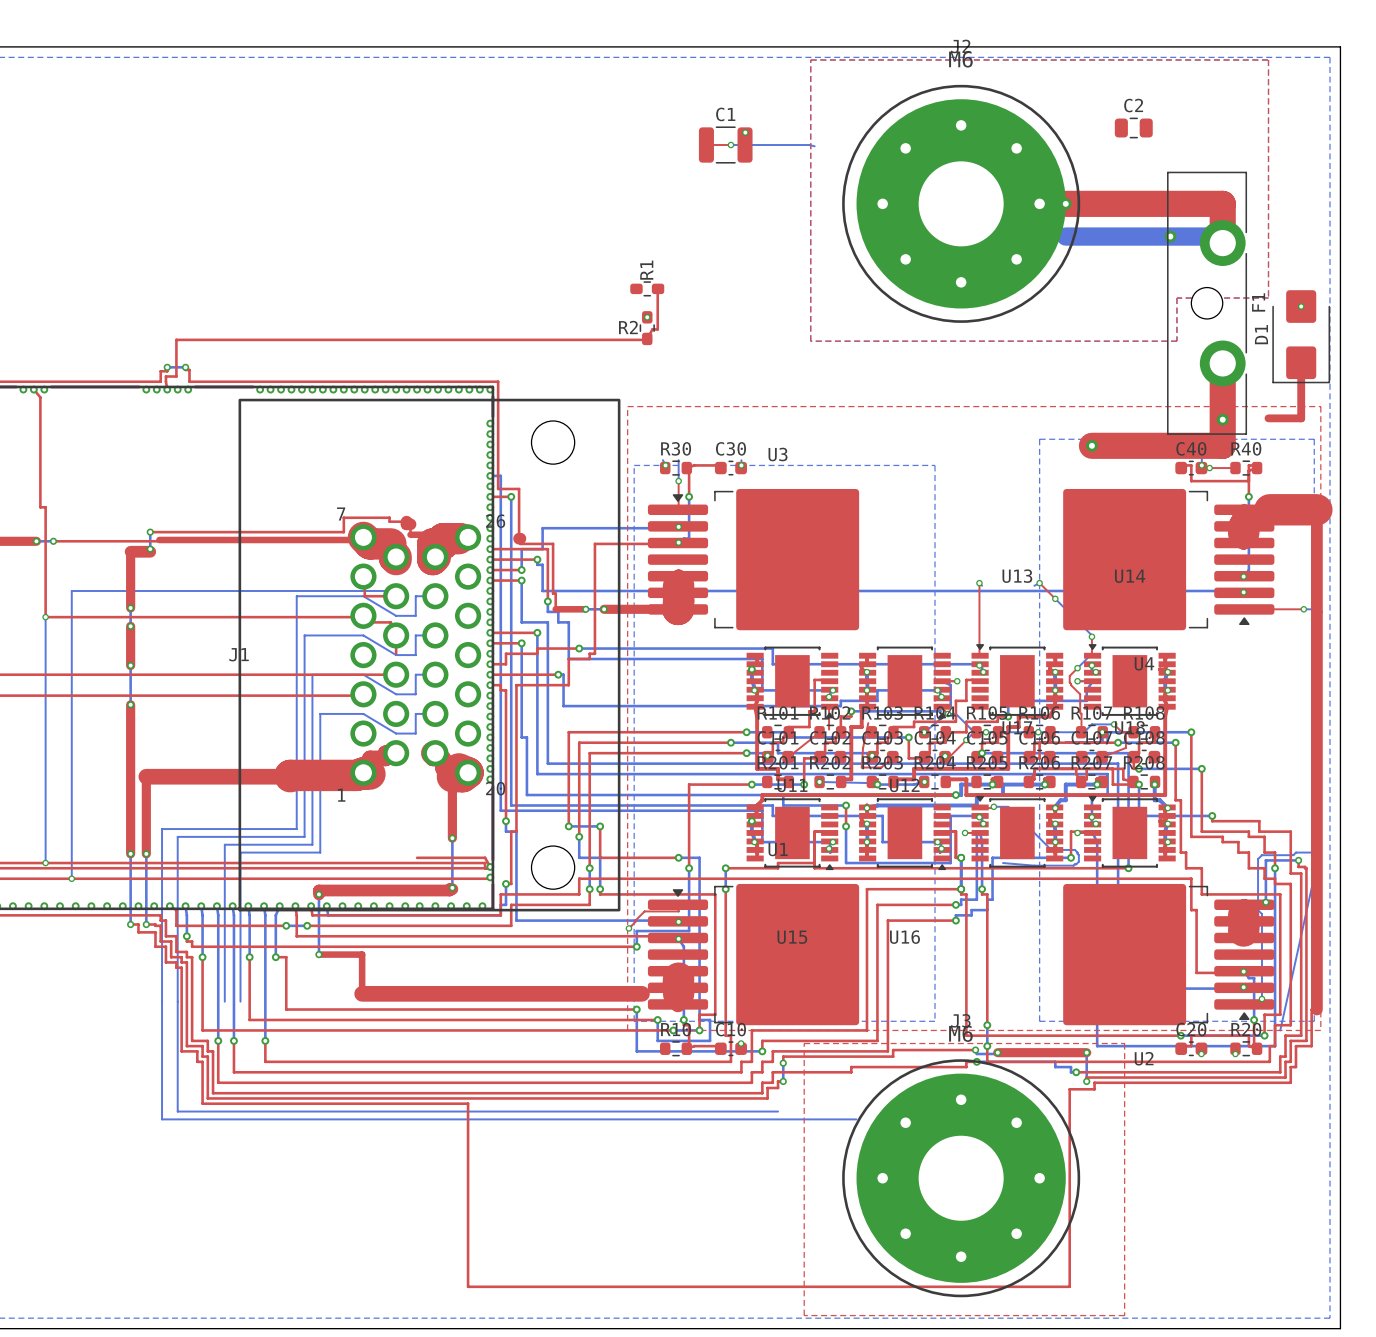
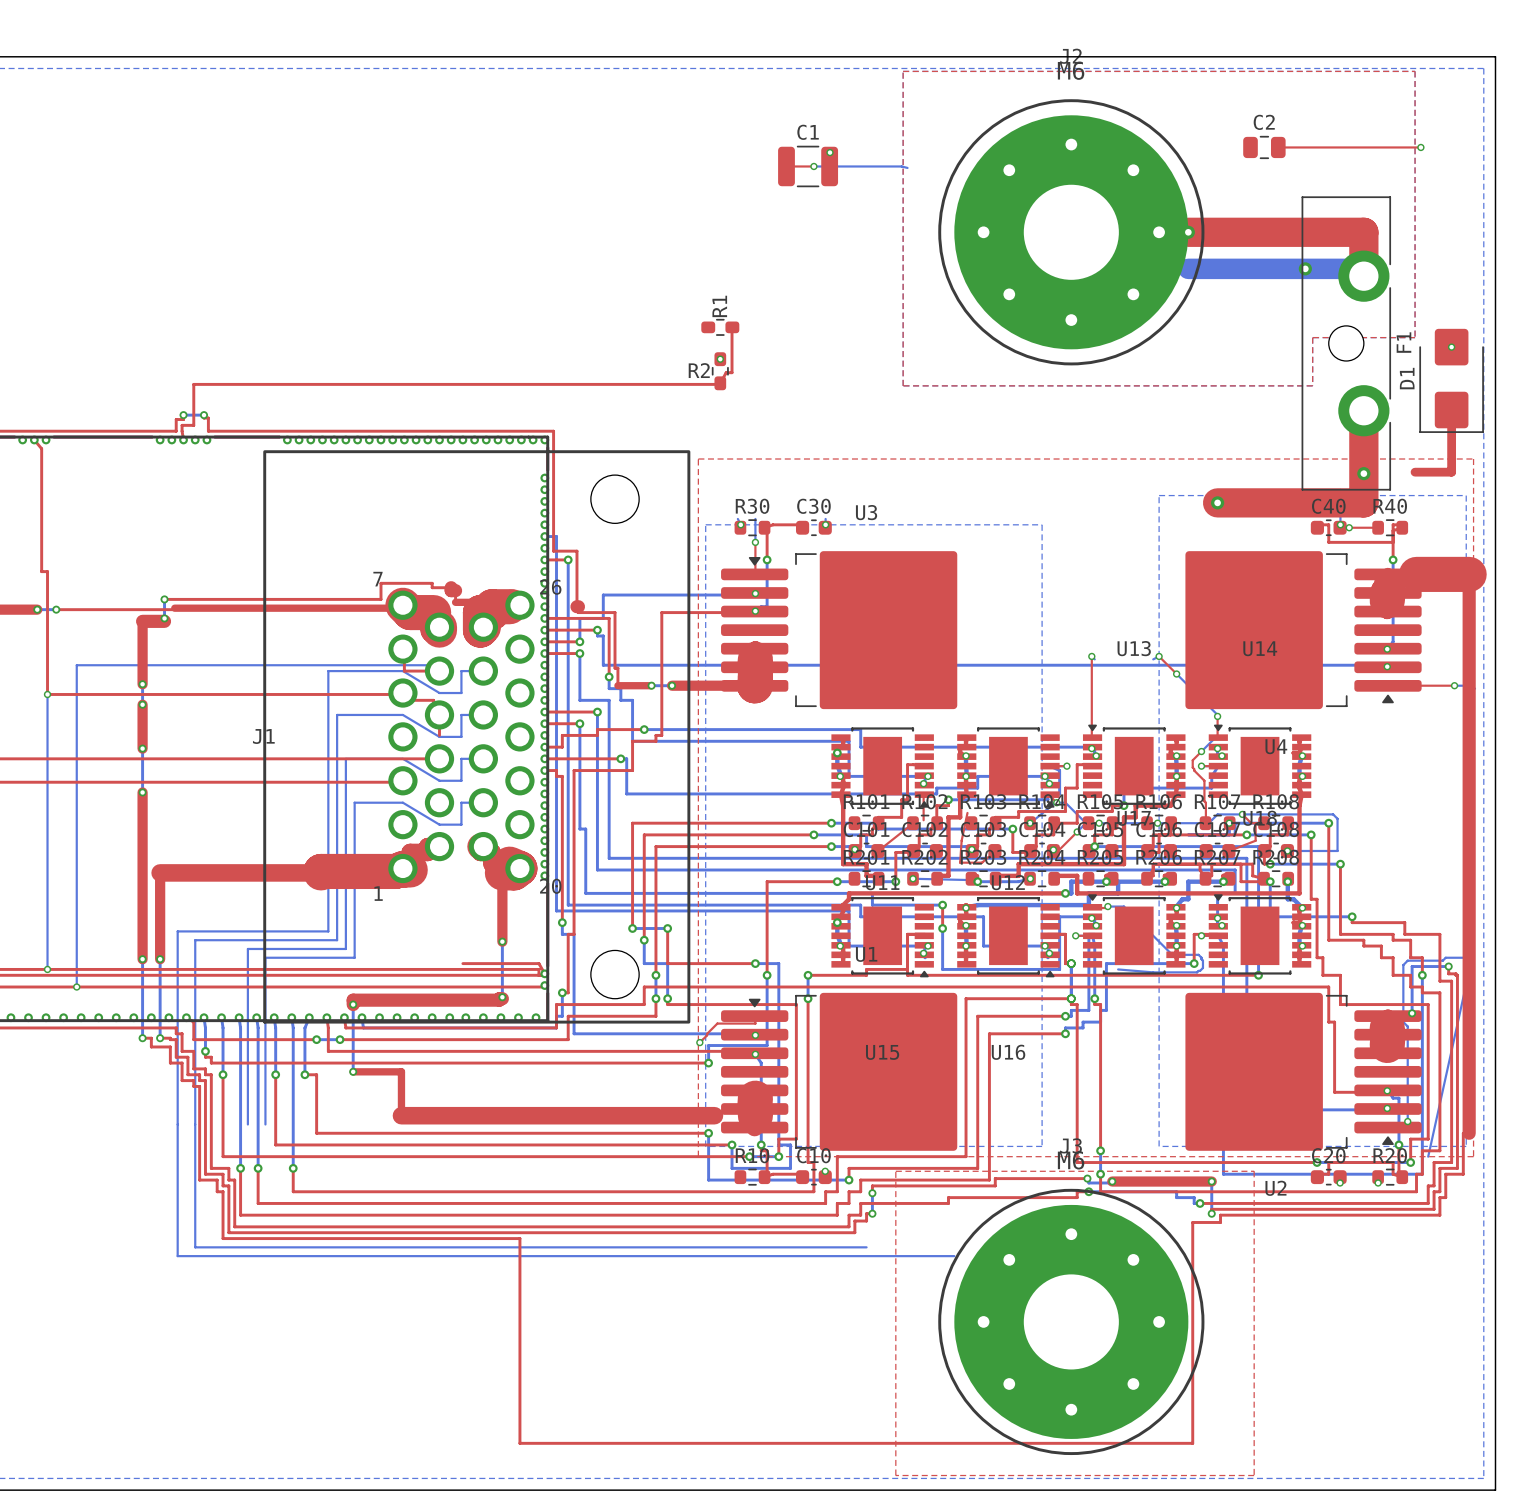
top track: none -> (1278, 147) (1420, 147)
via: none -> (1420, 147)
bottom track: none -> (1245, 814) (1333, 814) (1337, 818) (1337, 850) (1287, 850)
via: none -> (1287, 850)

